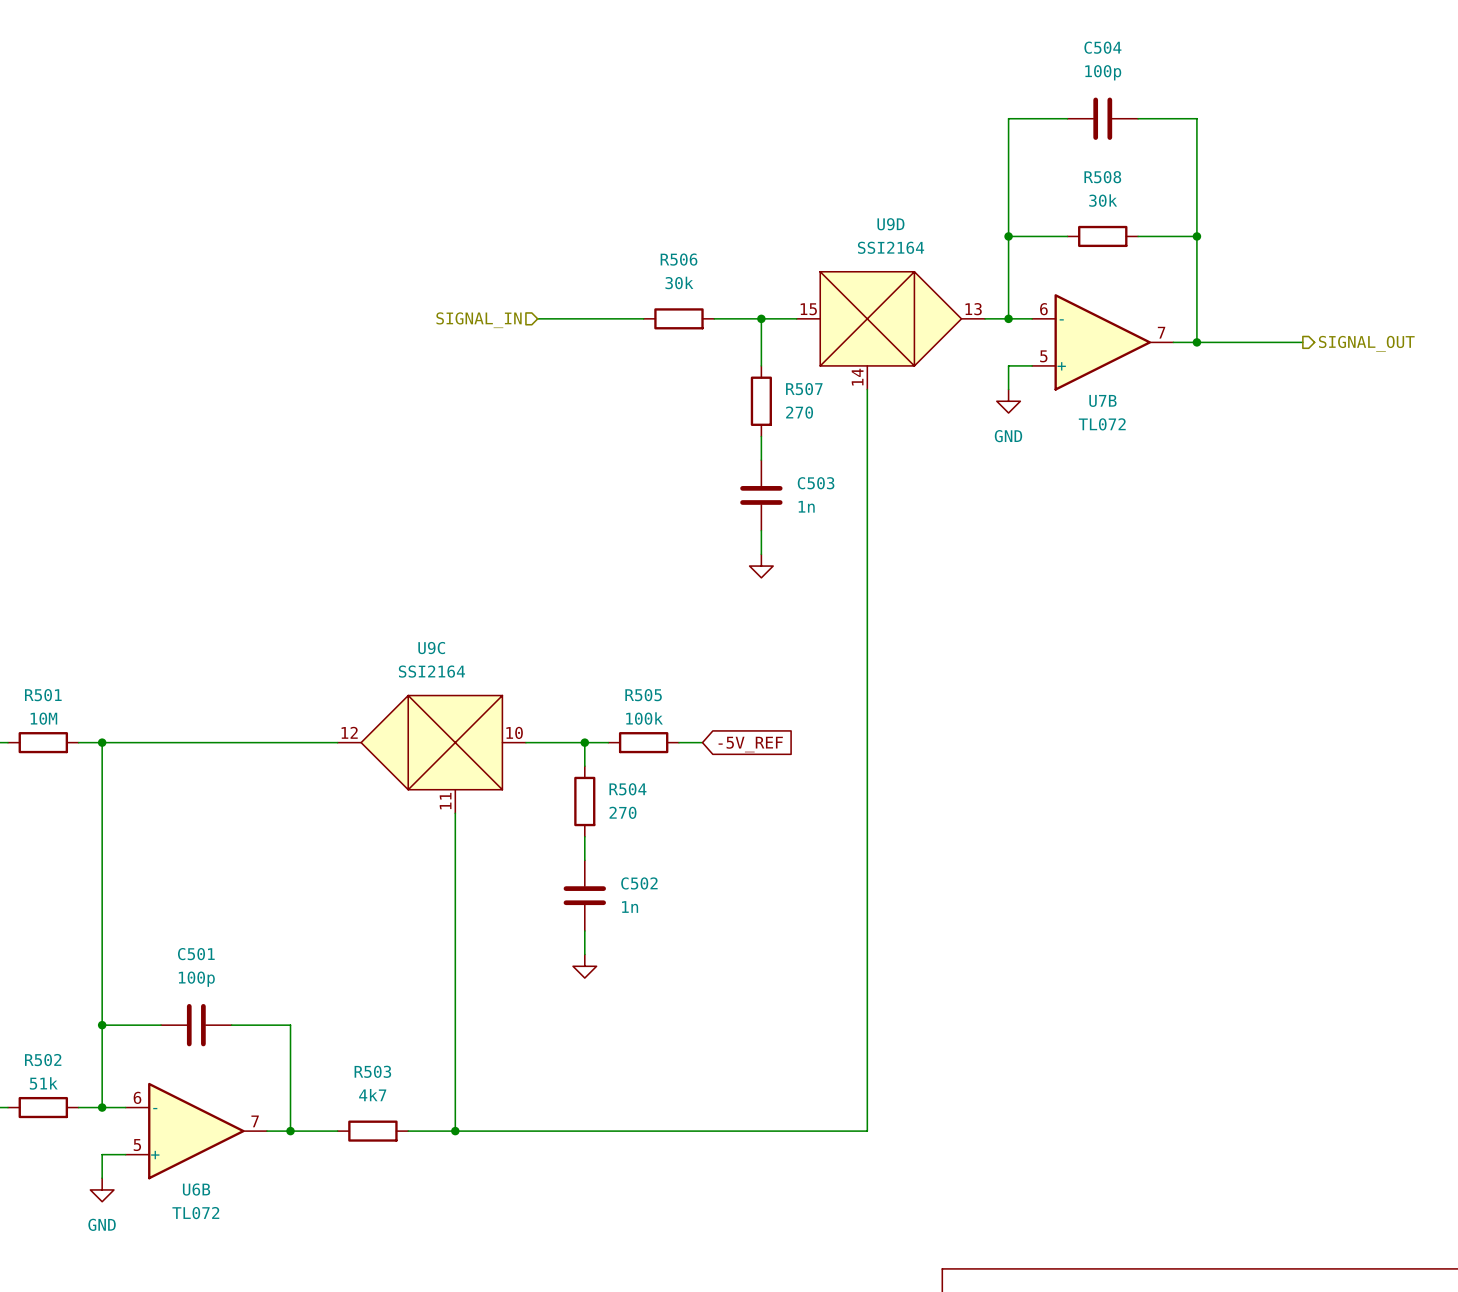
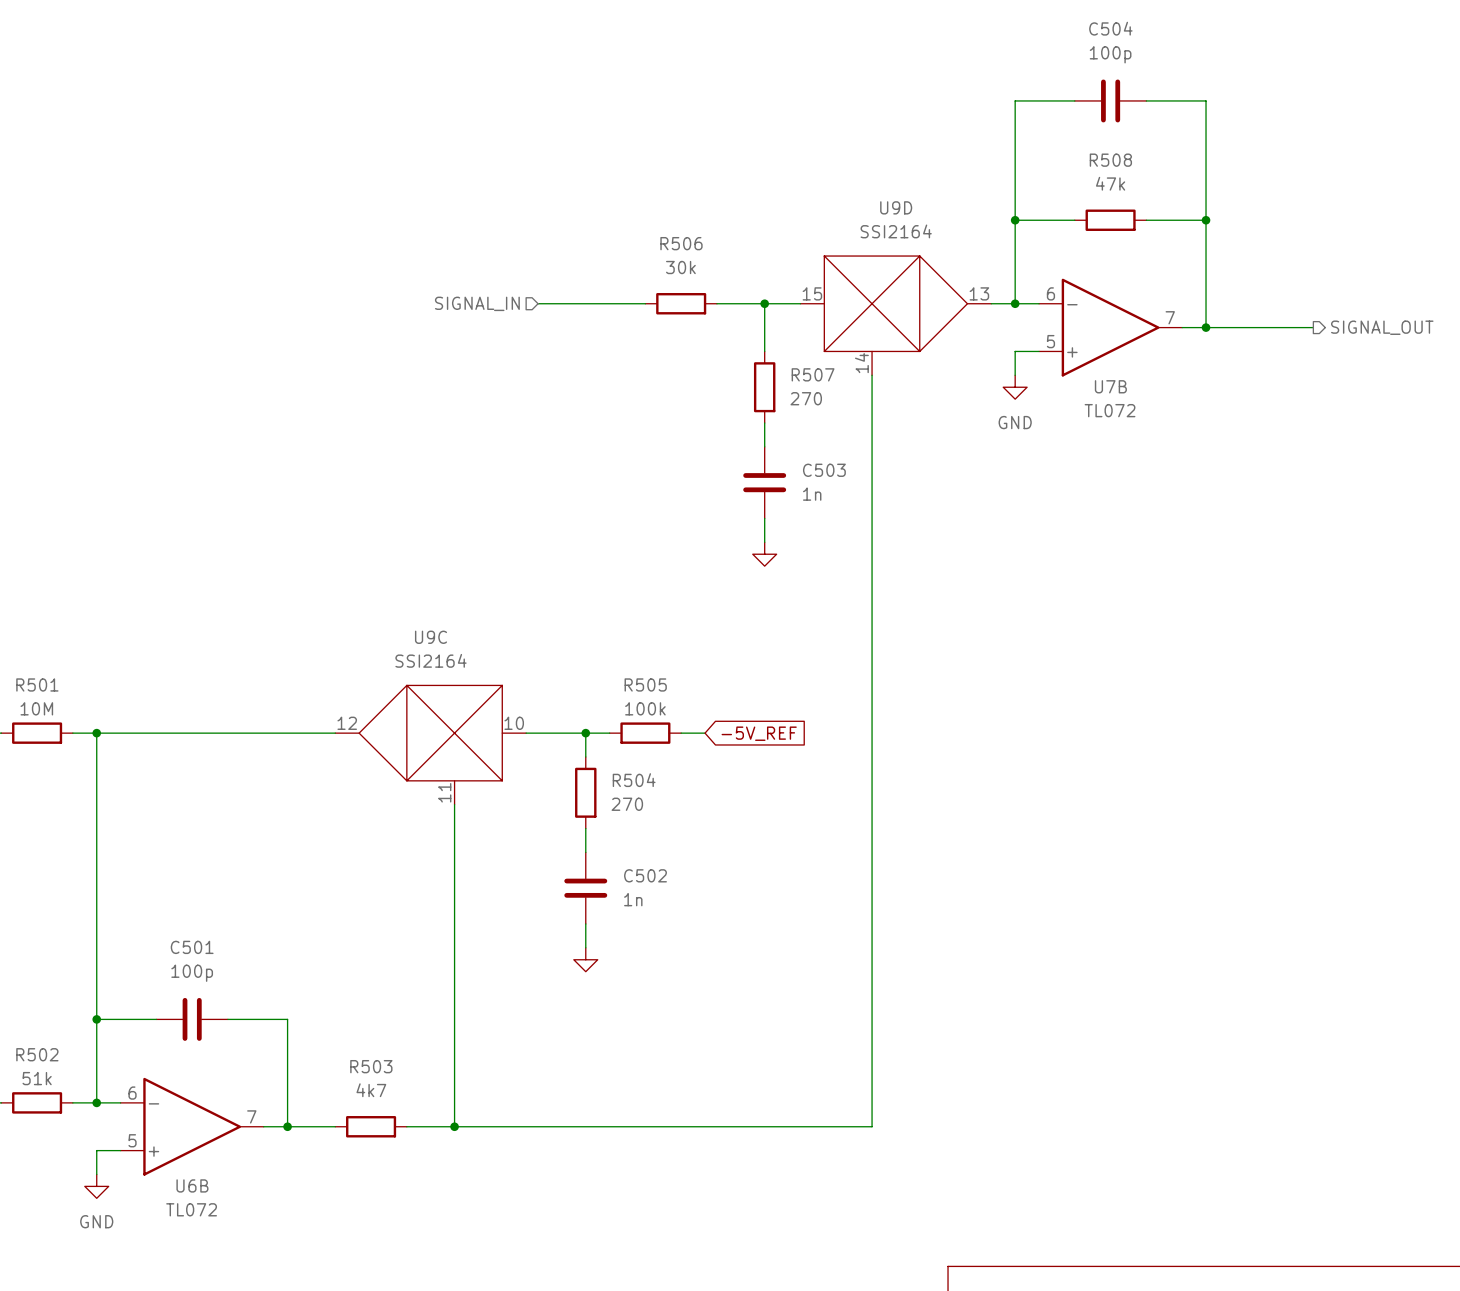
R508 value: 30k (1103, 200) -> 47k (1110, 183)

